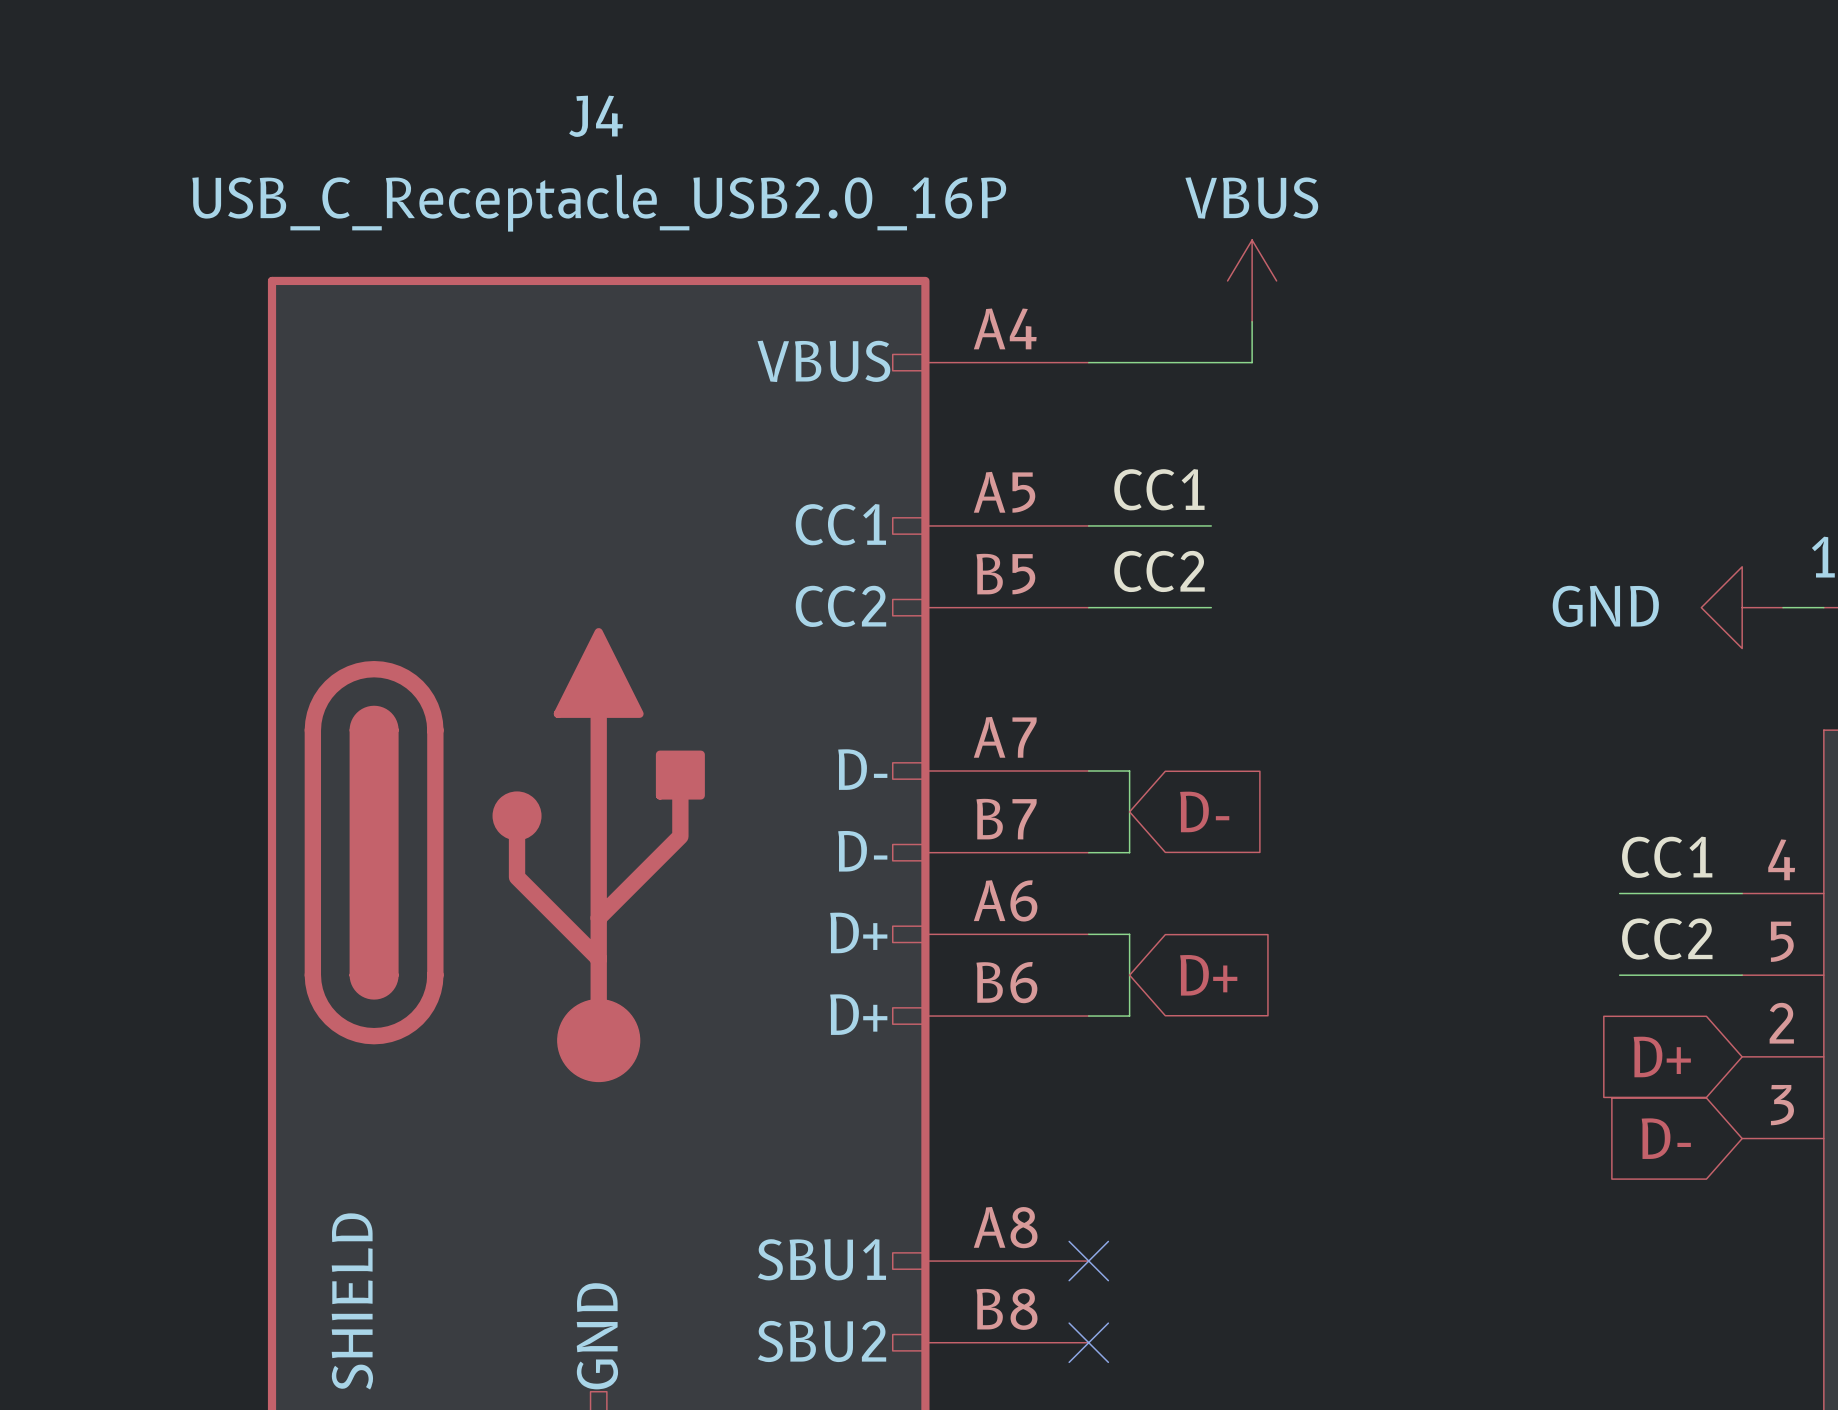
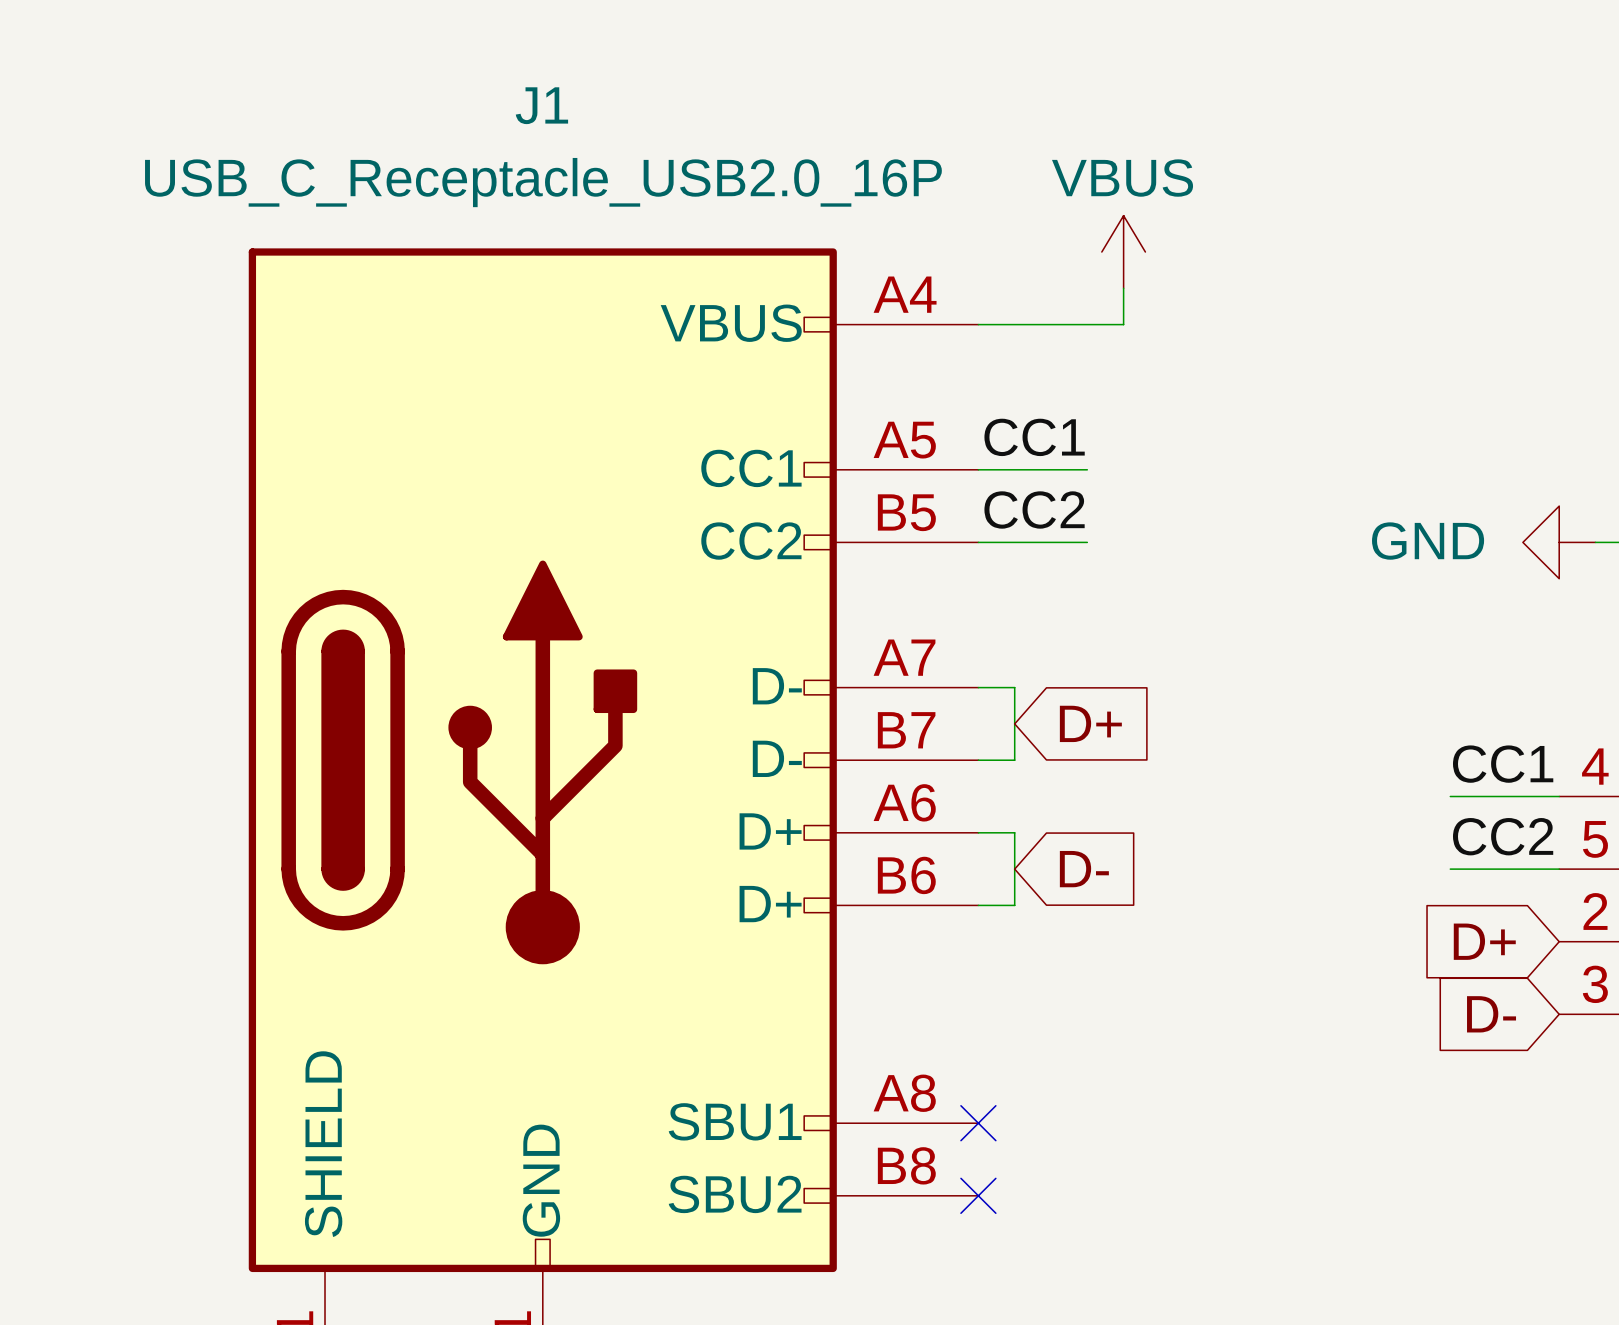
J4 name: J4 (596, 116) -> J1 (541, 105)
global label: D- (1204, 811) -> D+ (1090, 723)
global label: D+ (1208, 975) -> D- (1084, 869)

